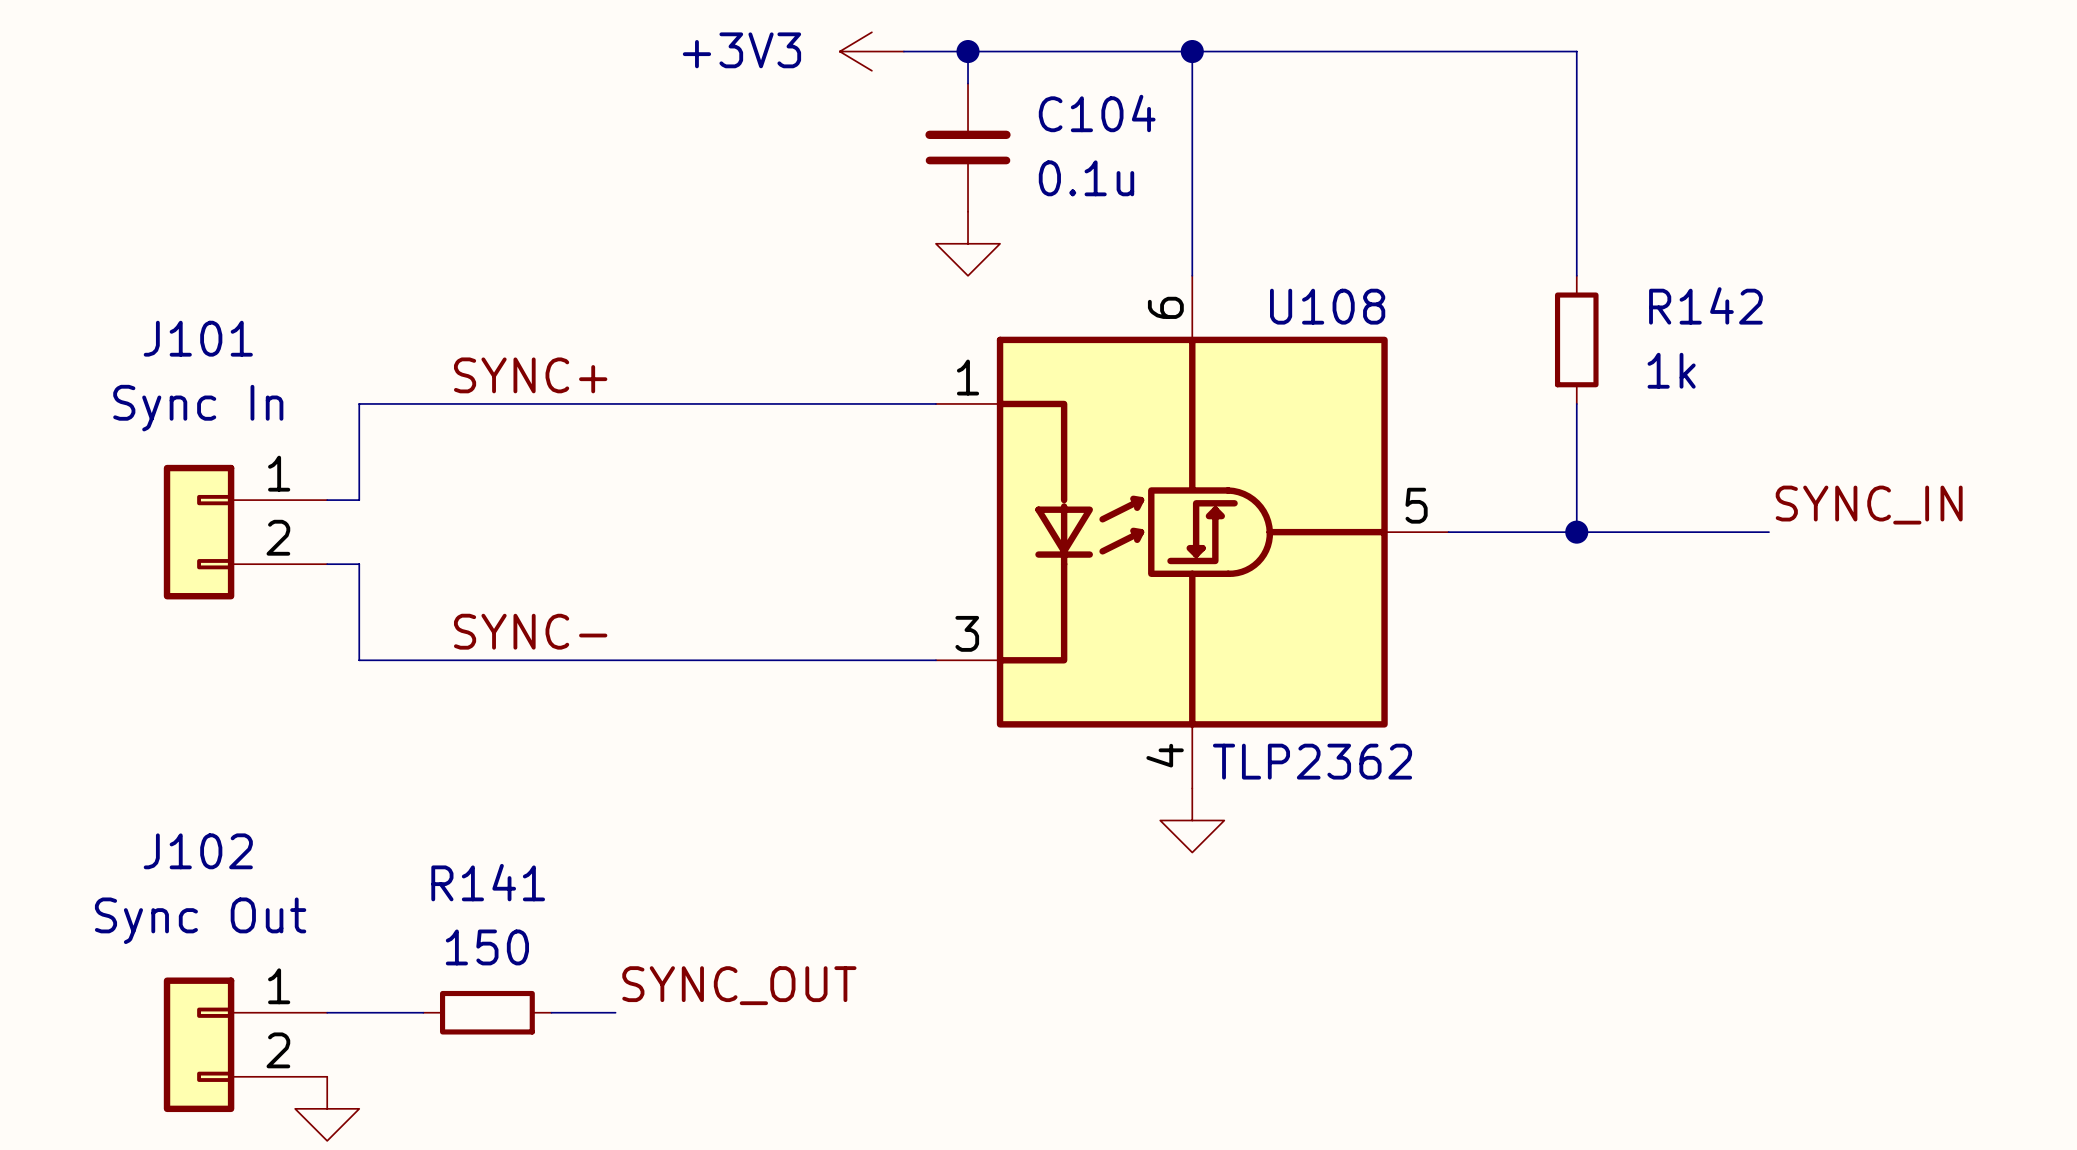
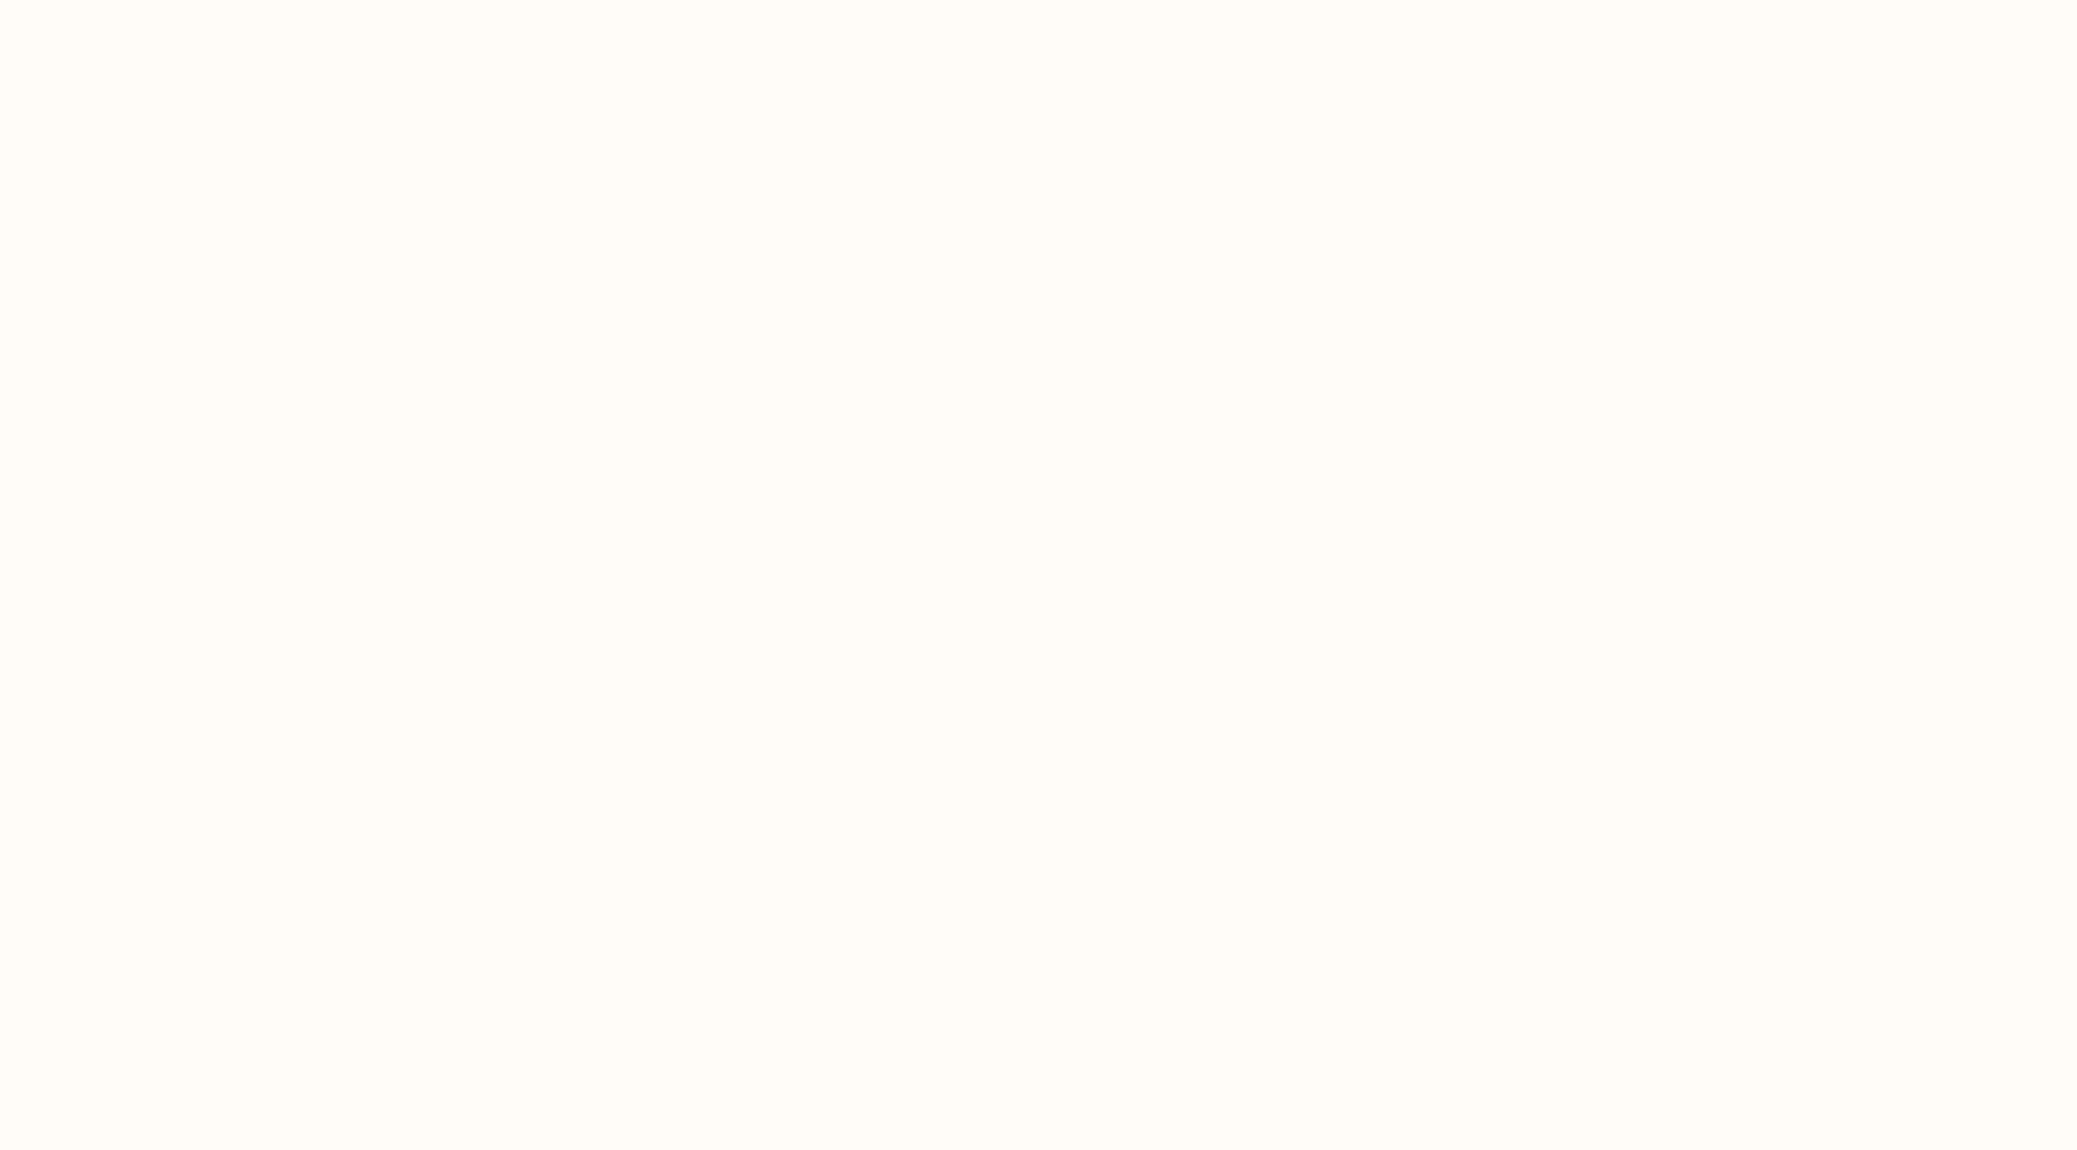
power symbol: +3V3 (871, 51) -> none
wire: (903, 51) (1576, 51) (1576, 275) -> none
wire: (968, 51) (968, 83) -> none
junction: (968, 51) -> none
wire: (1192, 51) (1192, 275) -> none
junction: (1192, 51) -> none
C104: 0.1u (968, 147) -> none
power symbol: (968, 243) -> none
R142: 1k (1576, 339) -> none
label: SYNC+ (530, 375) -> none
wire: (935, 403) (359, 403) (359, 500) (327, 500) -> none
wire: (1576, 403) (1576, 532) -> none
label: SYNC_IN (1869, 505) -> none
J101: Sync In (245, 532) -> none
U108: TLP2362 (1192, 532) -> none
wire: (1448, 532) (1769, 532) -> none
junction: (1576, 532) -> none
wire: (327, 564) (359, 564) (359, 660) (935, 660) -> none
label: SYNC- (530, 631) -> none
power symbol: (1192, 820) -> none
label: SYNC_OUT (739, 985) -> none
wire: (327, 1012) (423, 1012) -> none
R141: 150 (487, 1012) -> none
wire: (551, 1012) (615, 1012) -> none
J102: Sync Out (245, 1044) -> none
power symbol: (327, 1108) -> none

